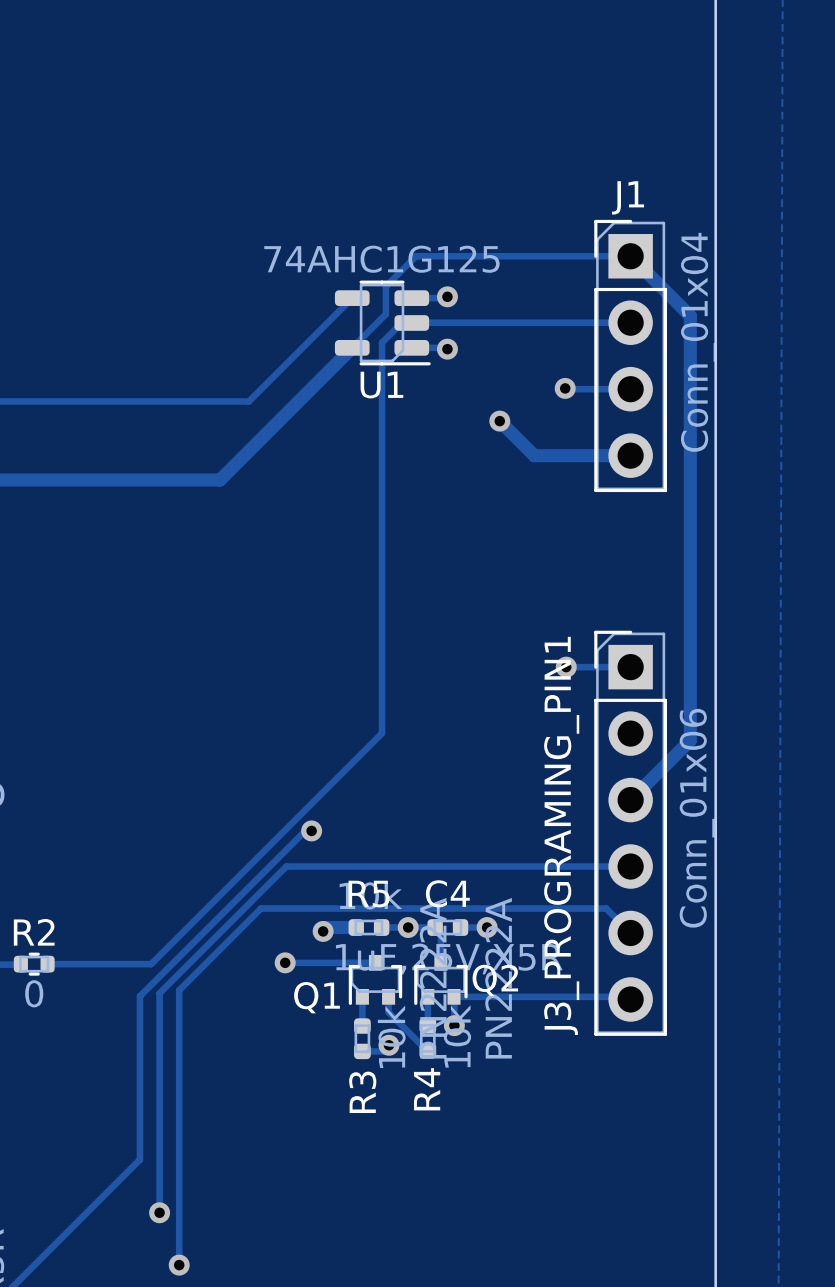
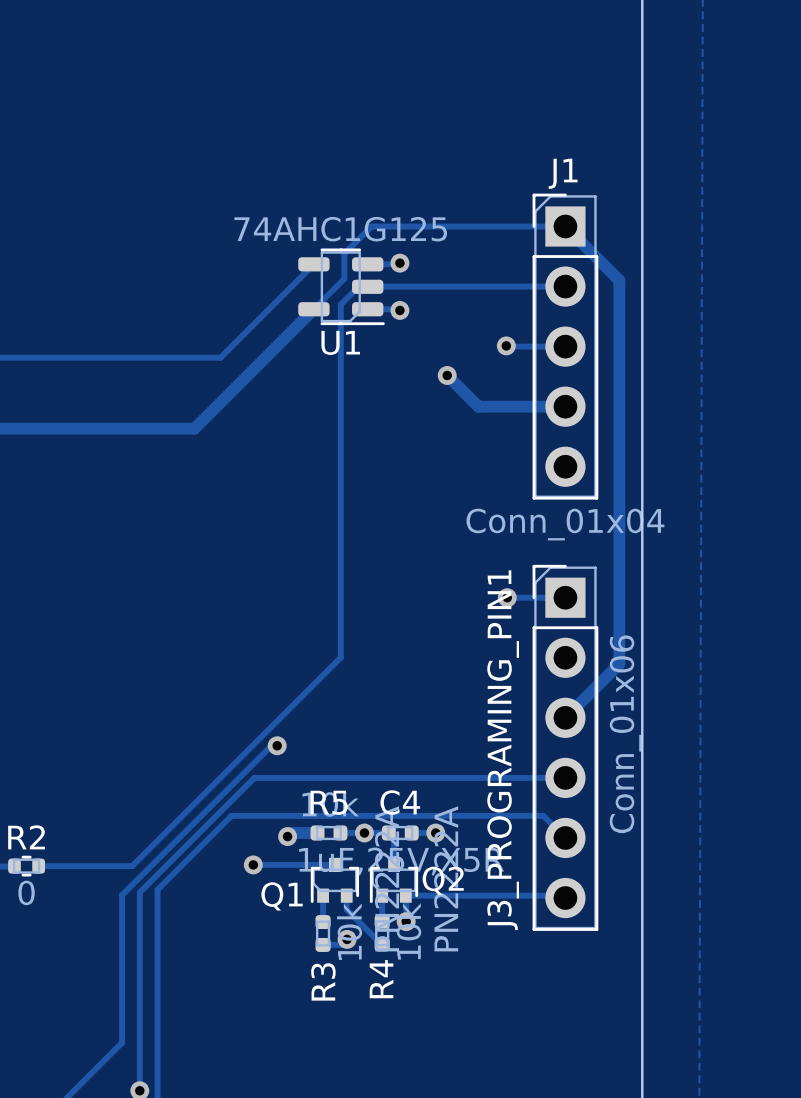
J1 footprint: [594, 219, 668, 493] -> [532, 193, 599, 500]
J1 value position: Conn_01x04 (698, 342) -> Conn_01x04 (565, 524)

